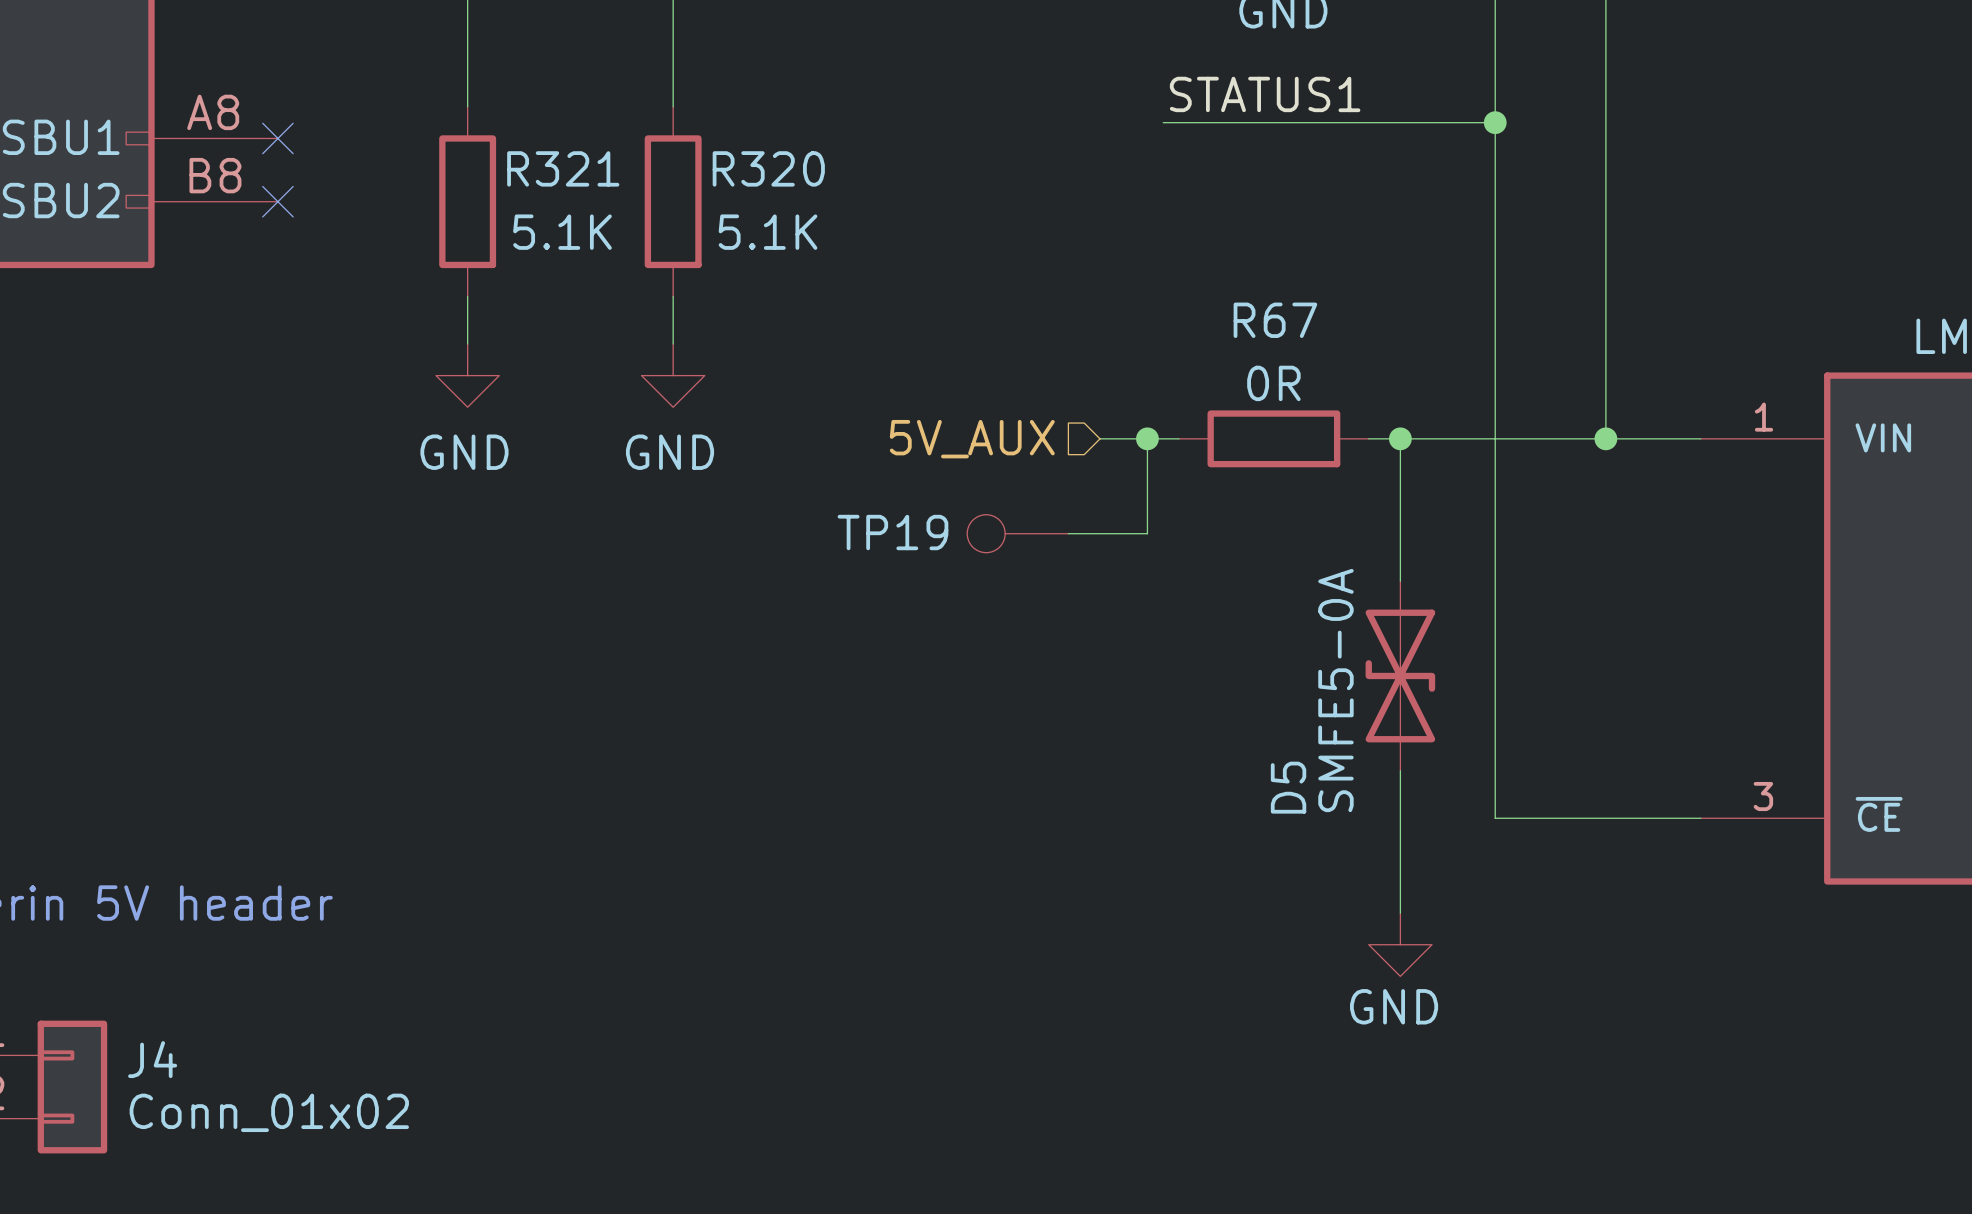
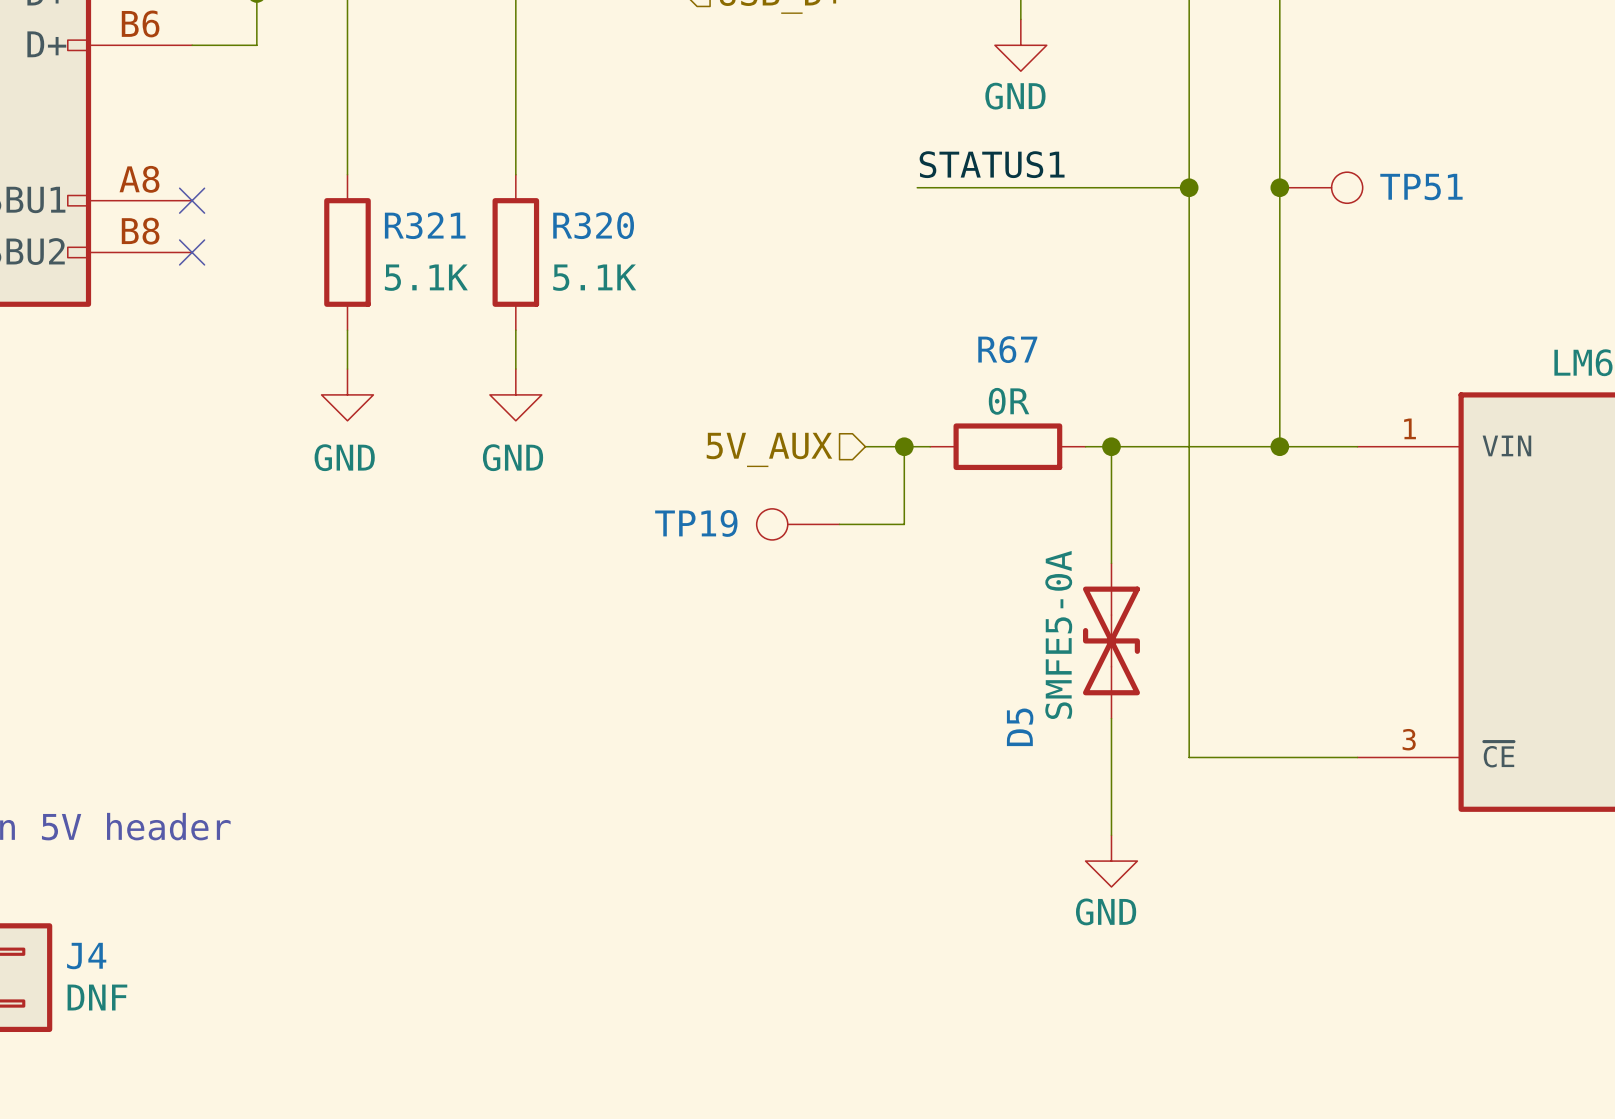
junction: none -> (1279, 187)
TP51: none -> (1321, 187)
J4 value: Conn_01x02 (269, 1112) -> DNF (97, 997)

